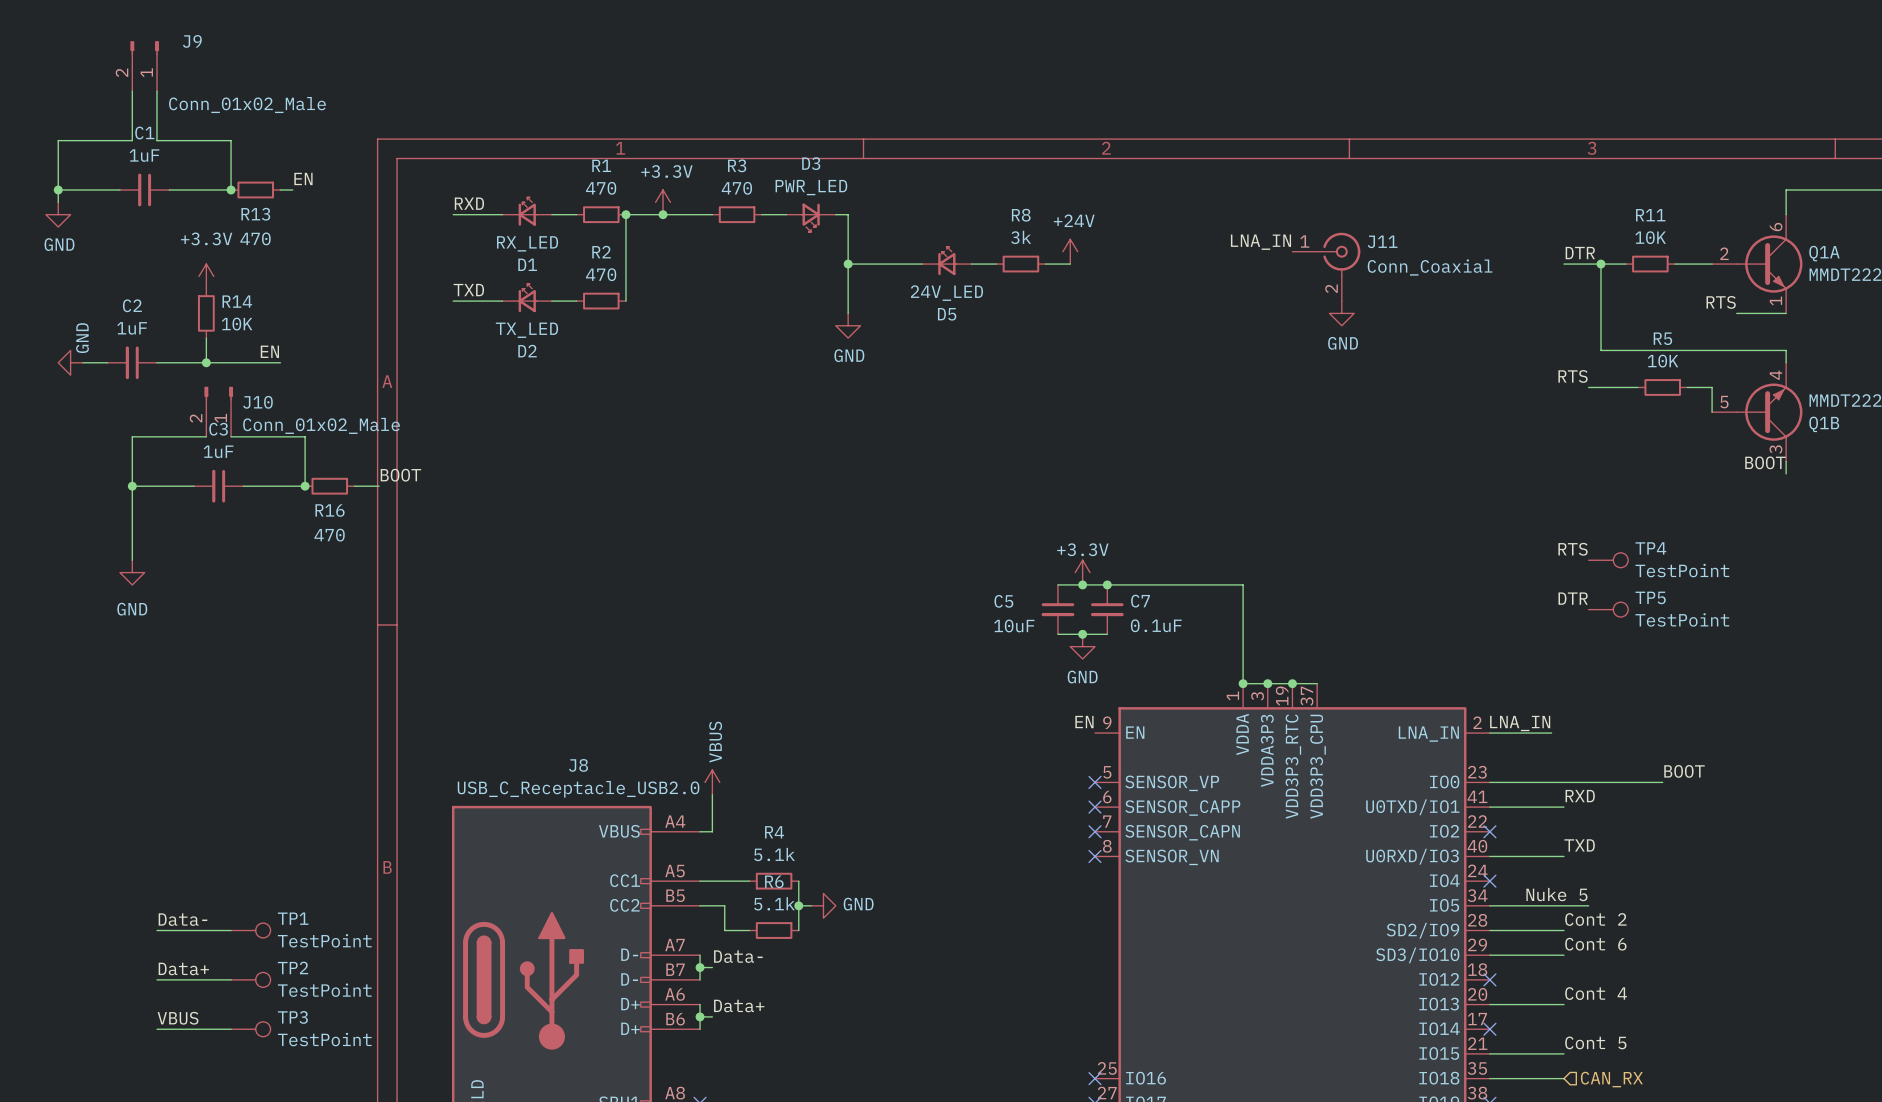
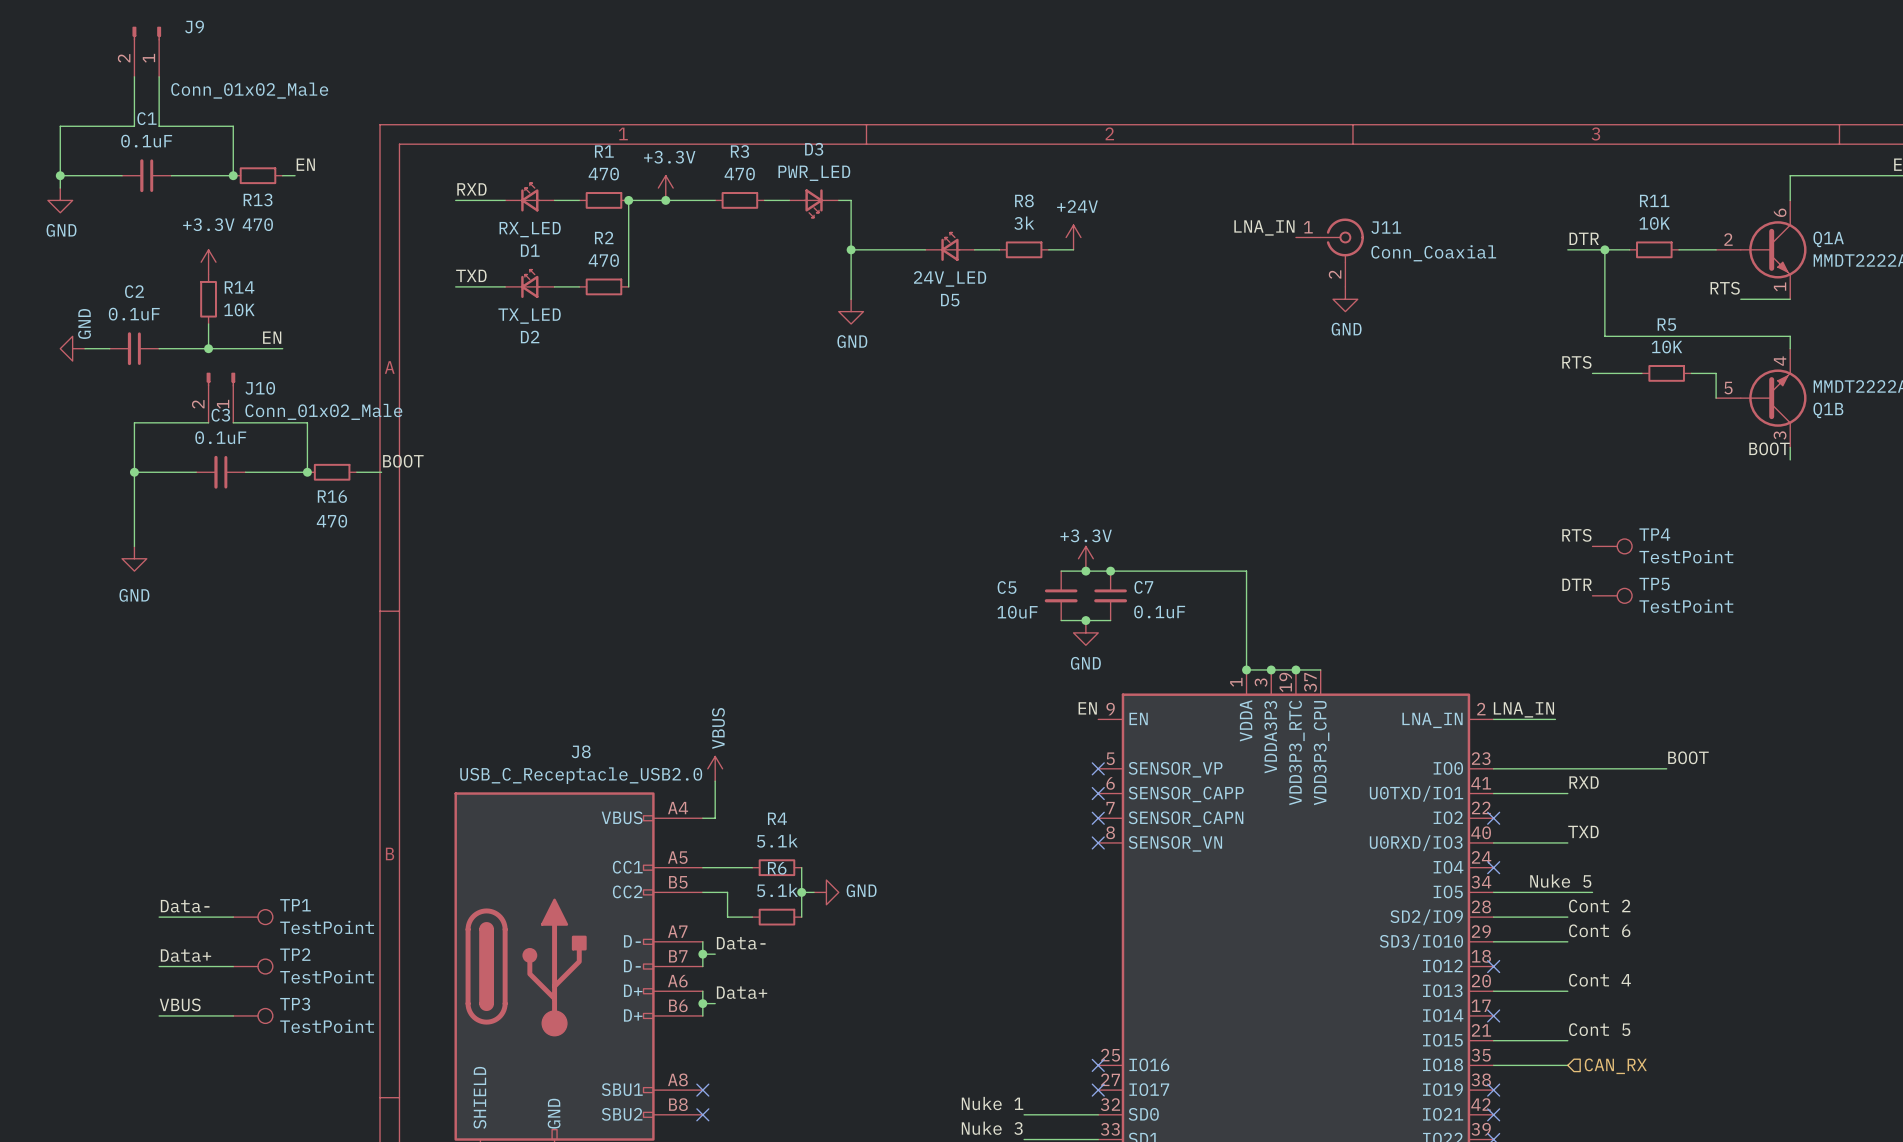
C1 value: 1uF (144, 155) -> 0.1uF (146, 141)
C2 value: 1uF (132, 328) -> 0.1uF (134, 314)
C3 value: 1uF (218, 451) -> 0.1uF (220, 437)

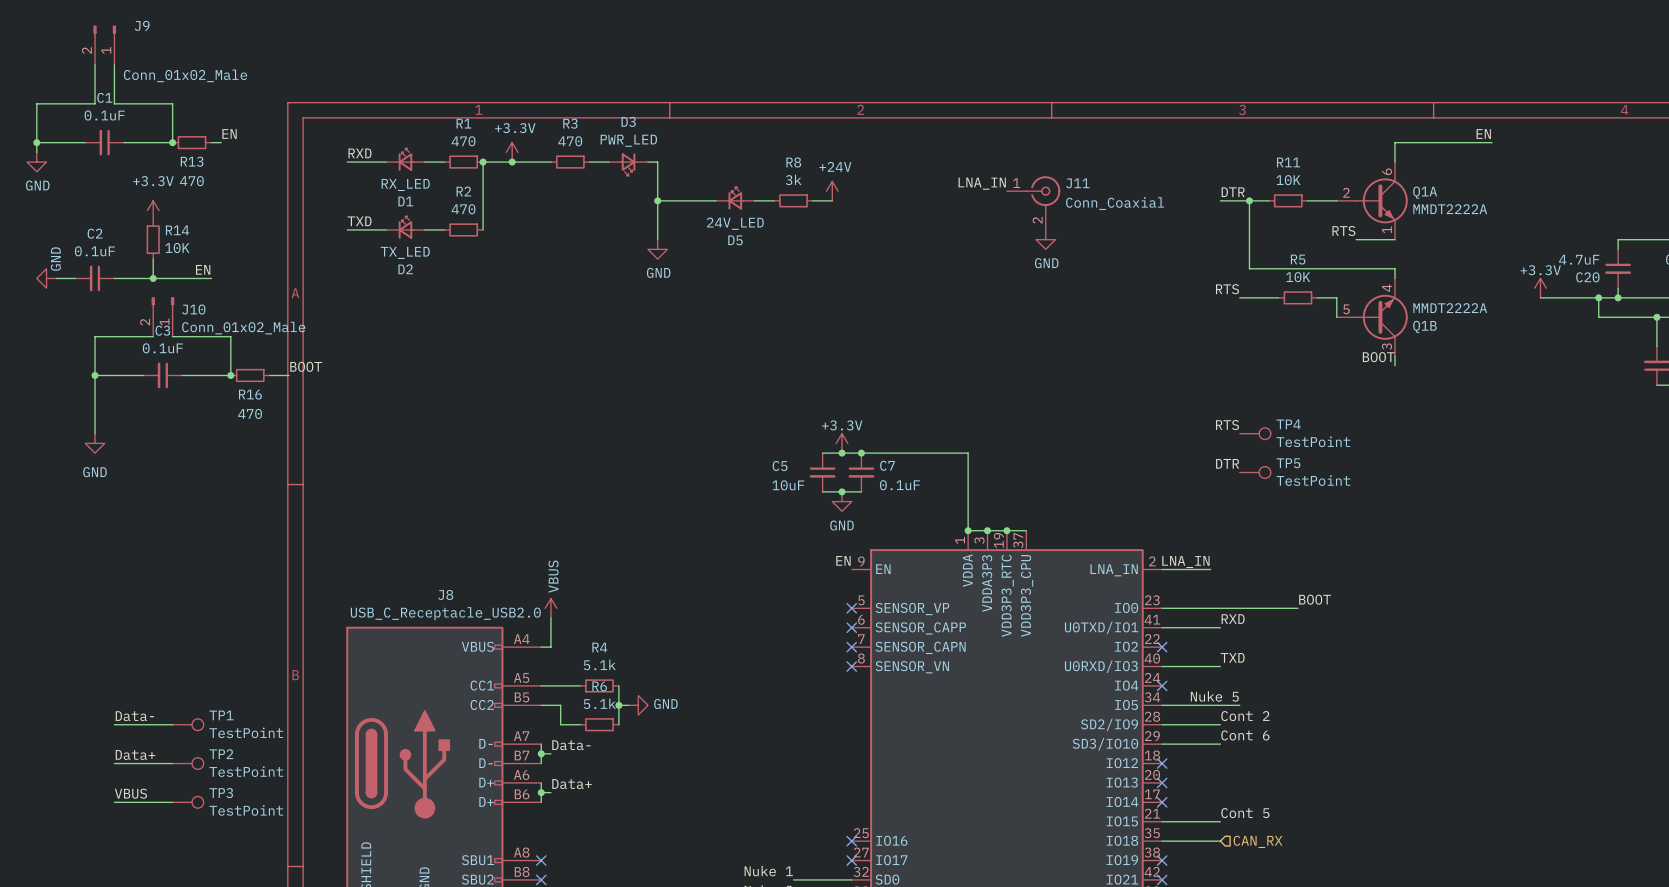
label: Cont 4 (1599, 980) -> none
wire: (1493, 991) (1567, 991) -> none
no-connect mark: none -> (1162, 782)

